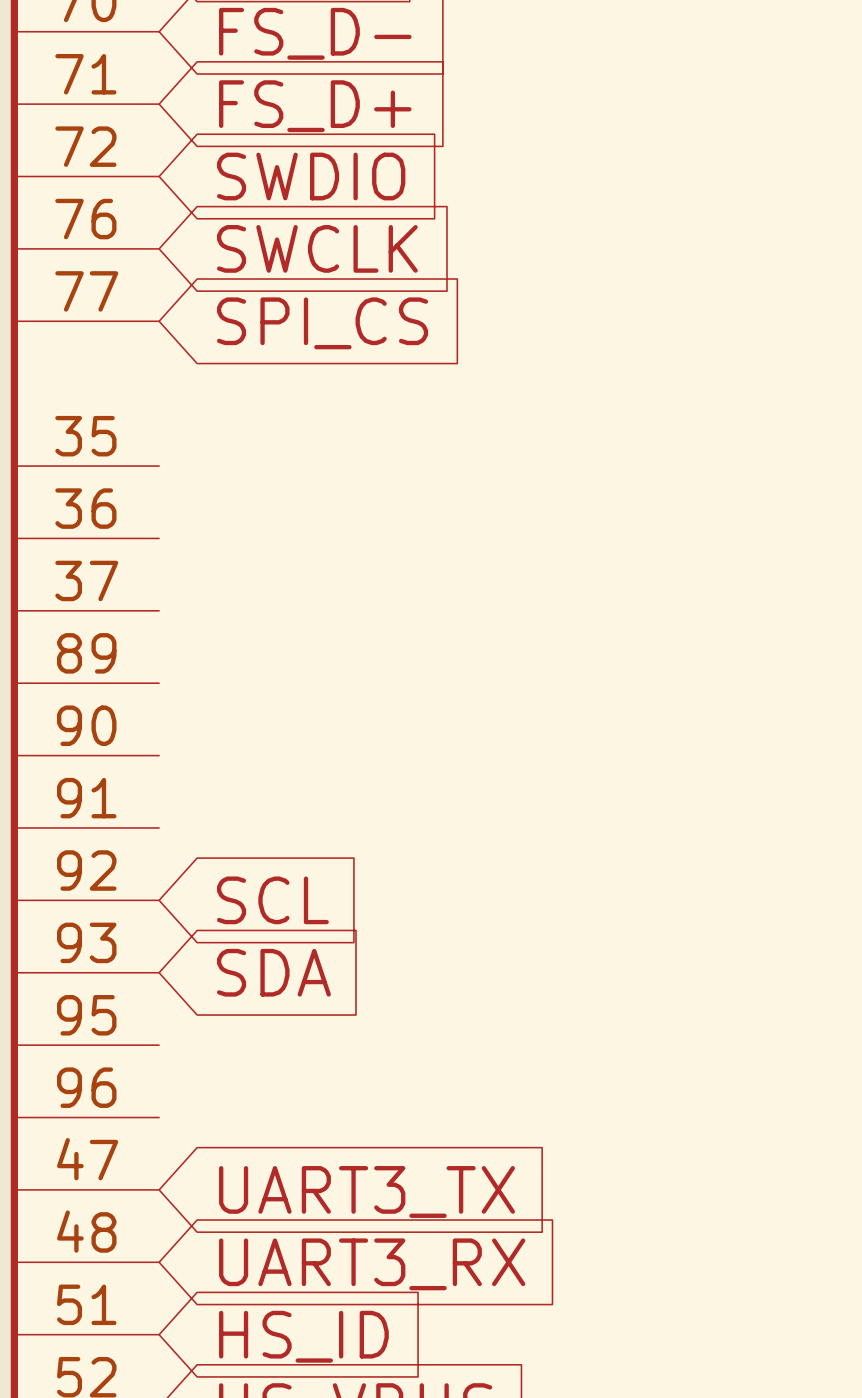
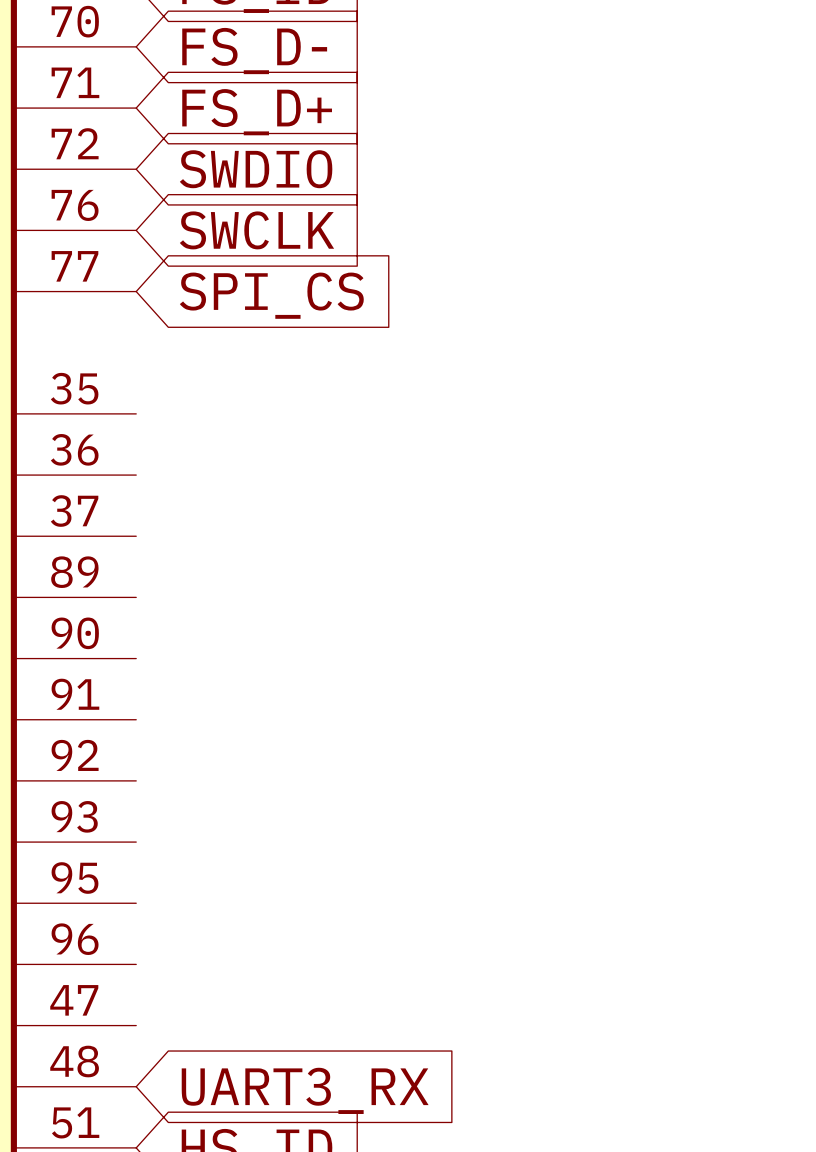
global label: SCL (272, 900) -> none
global label: SDA (273, 972) -> none
global label: UART3_TX (367, 1191) -> none

